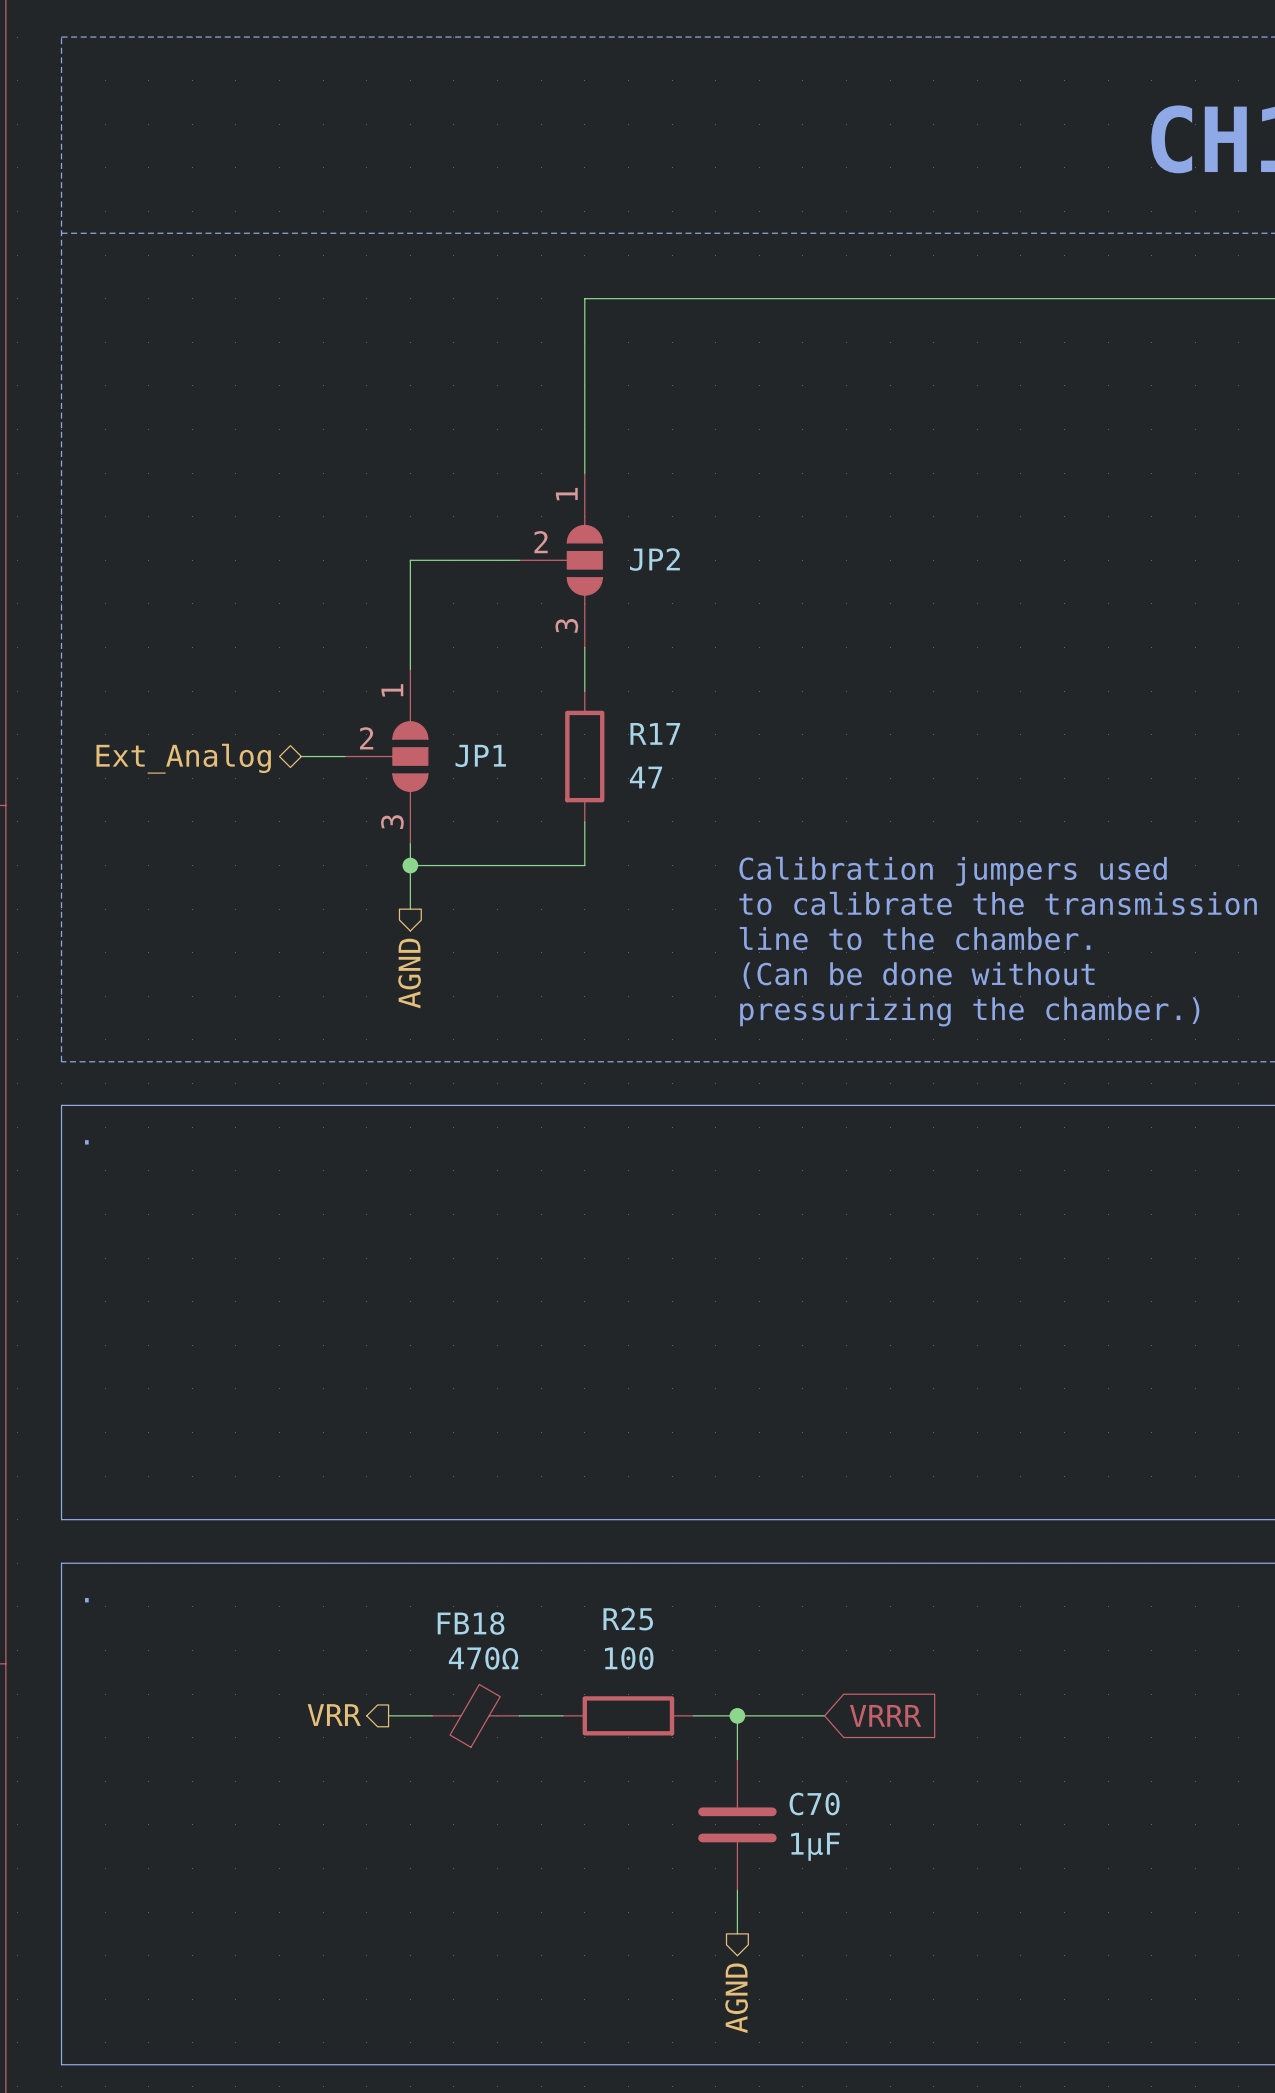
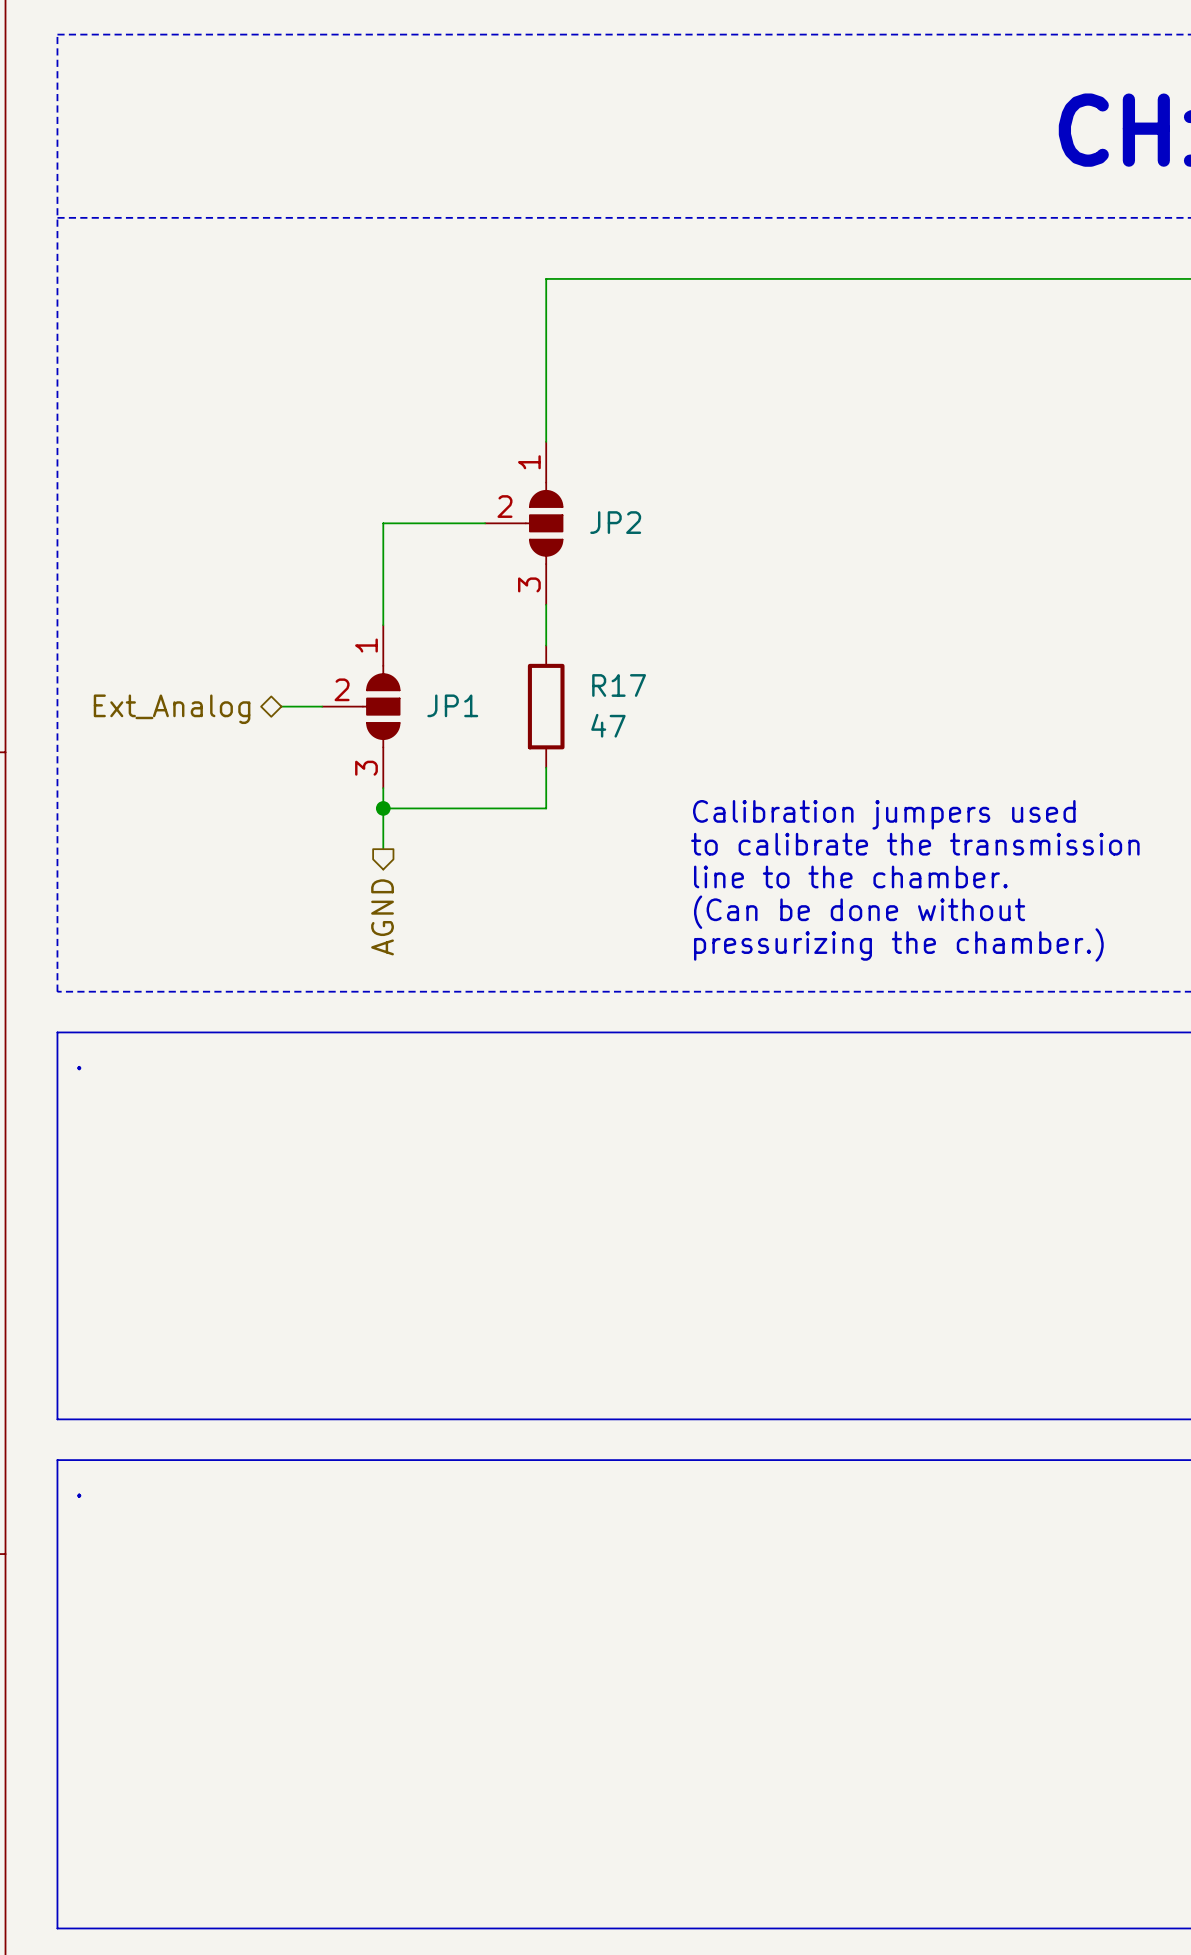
hierarchical label: VRR (334, 1715) -> none
wire: (388, 1715) (432, 1715) -> none
FB18: 470Ω (475, 1715) -> none
wire: (519, 1715) (562, 1715) -> none
R25: 100 (628, 1715) -> none
wire: (693, 1715) (824, 1715) -> none
wire: (737, 1715) (737, 1759) -> none
junction: (737, 1715) -> none
global label: VRRR (885, 1715) -> none
C70: 1µF (737, 1824) -> none
wire: (737, 1890) (737, 1933) -> none
hierarchical label: AGND (736, 1998) -> none

